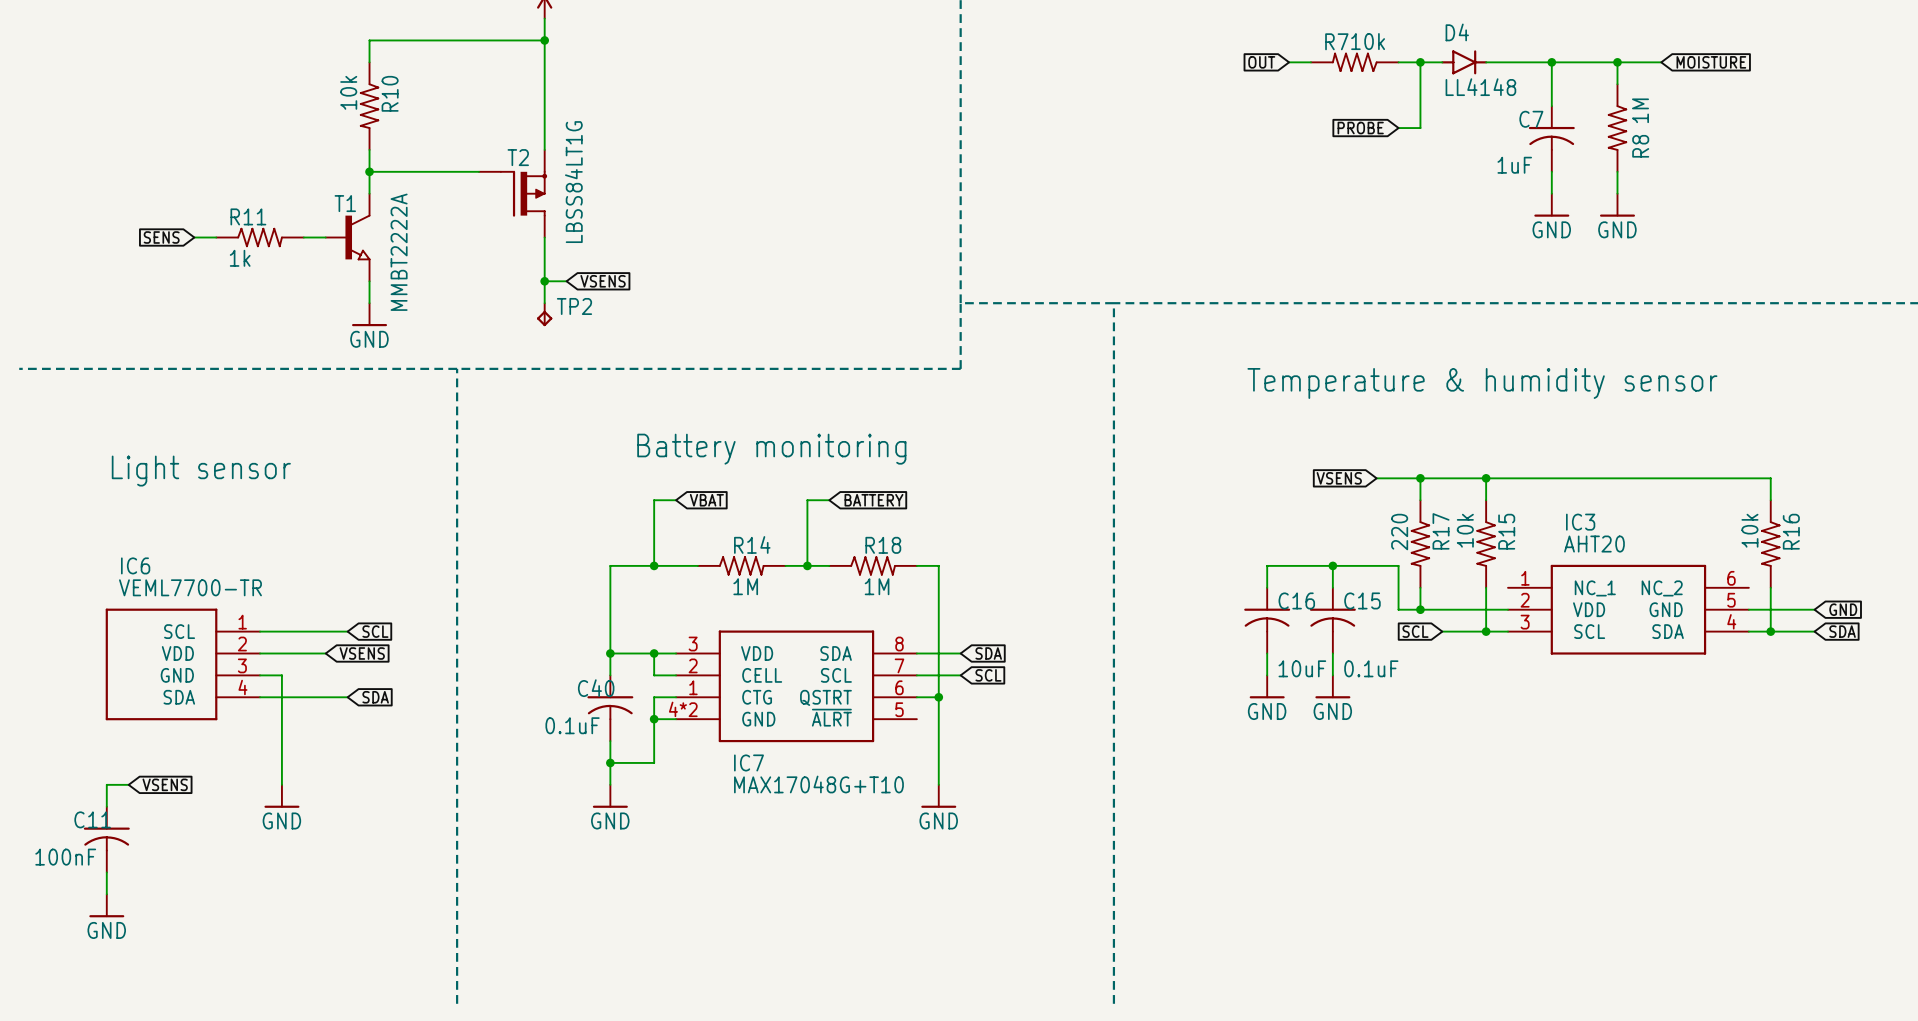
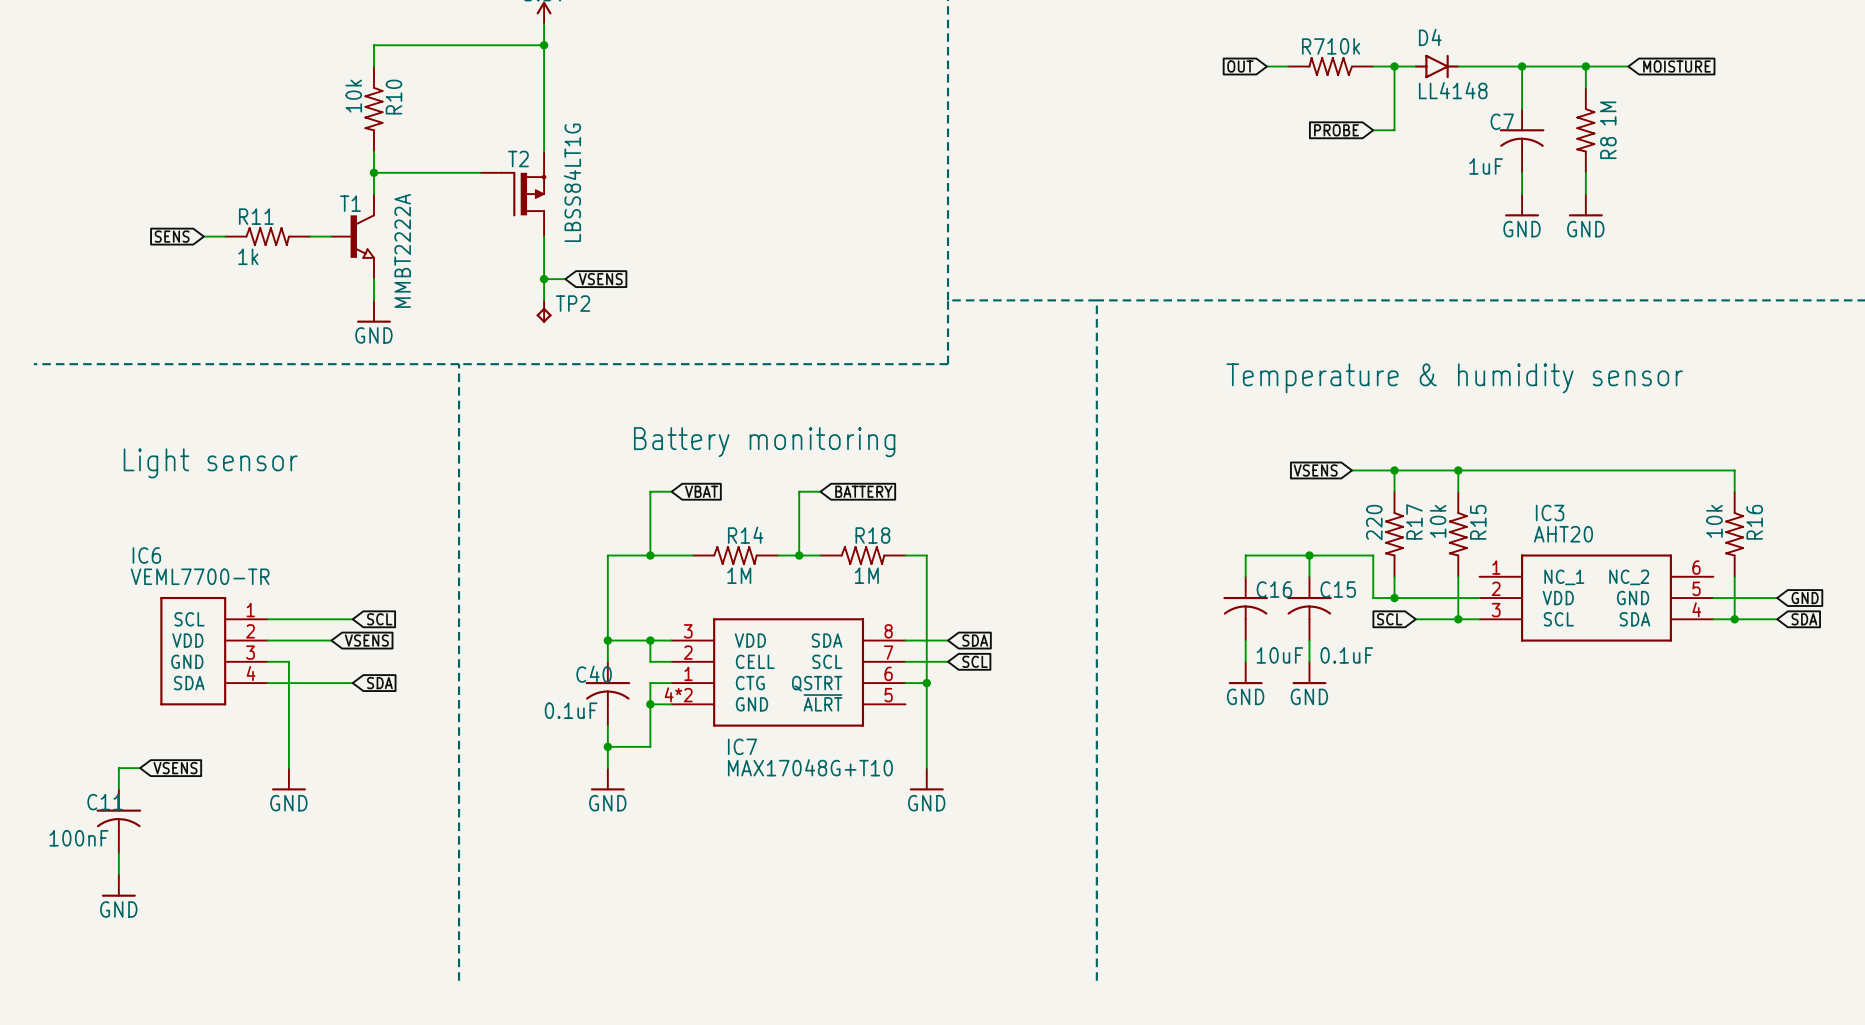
IC6 symbol: [105, 608, 261, 721] -> [160, 596, 268, 706]

